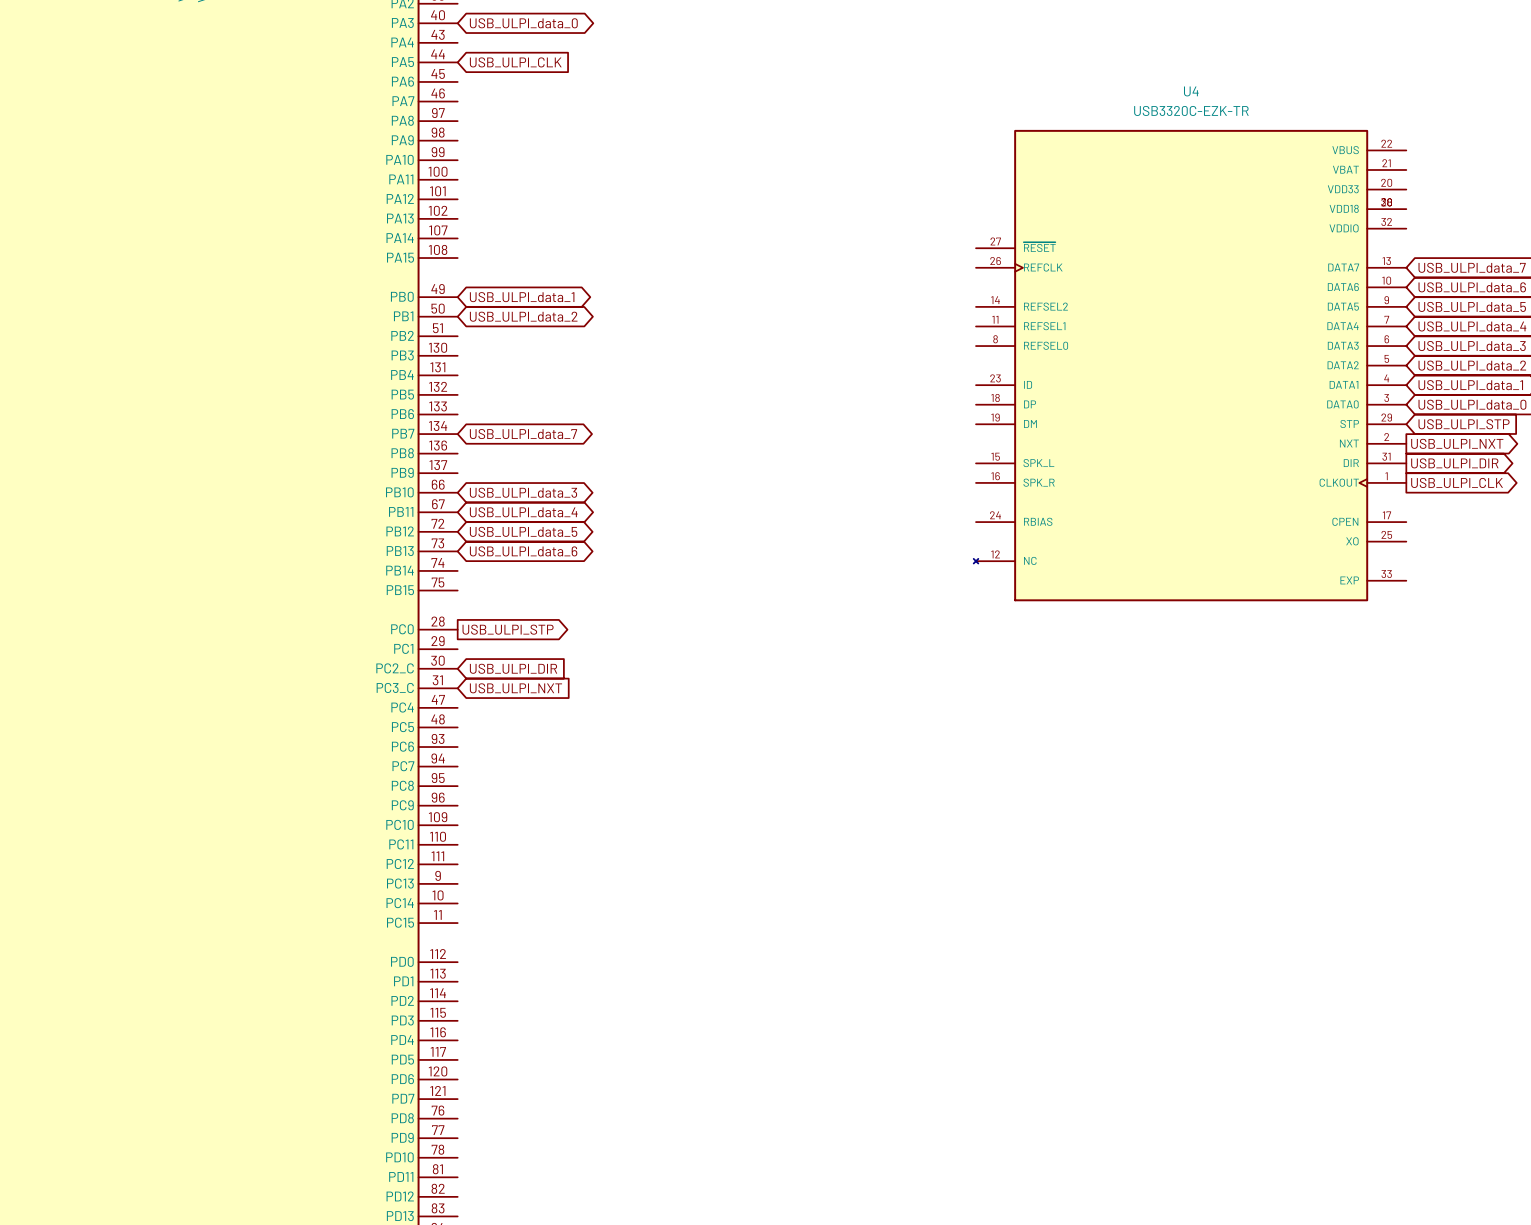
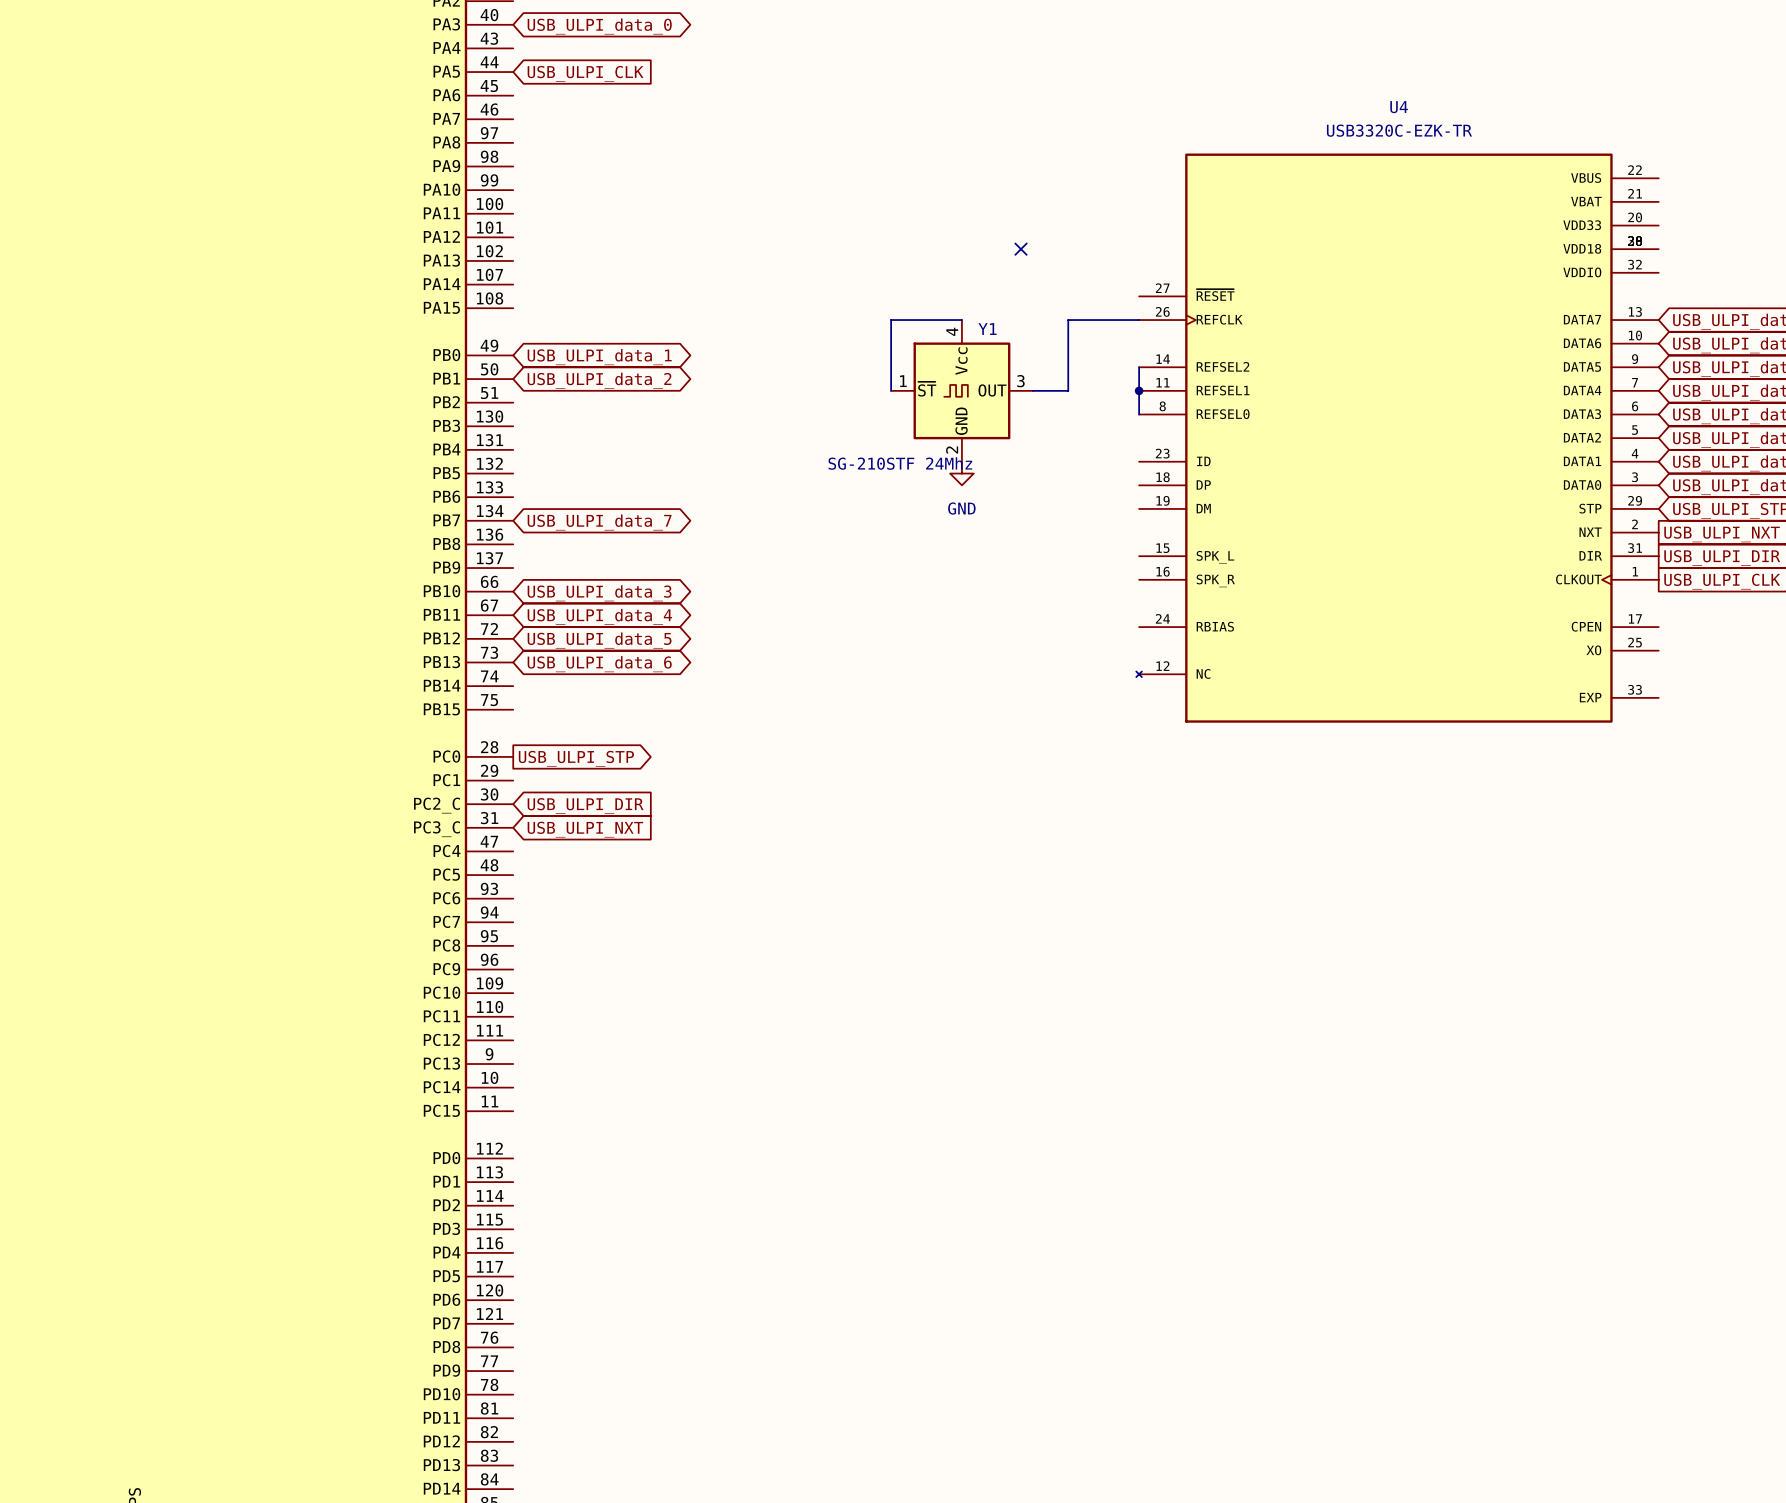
no-connect mark: none -> (1021, 249)
wire: none -> (961, 320) (891, 320) (891, 390)
wire: none -> (1139, 320) (1068, 320) (1068, 390) (1032, 390)
wire: none -> (1139, 367) (1139, 414)
Y1: none -> SG-210STF 24Mhz (961, 390)
junction: none -> (1139, 390)
power symbol: none -> GND (961, 473)

